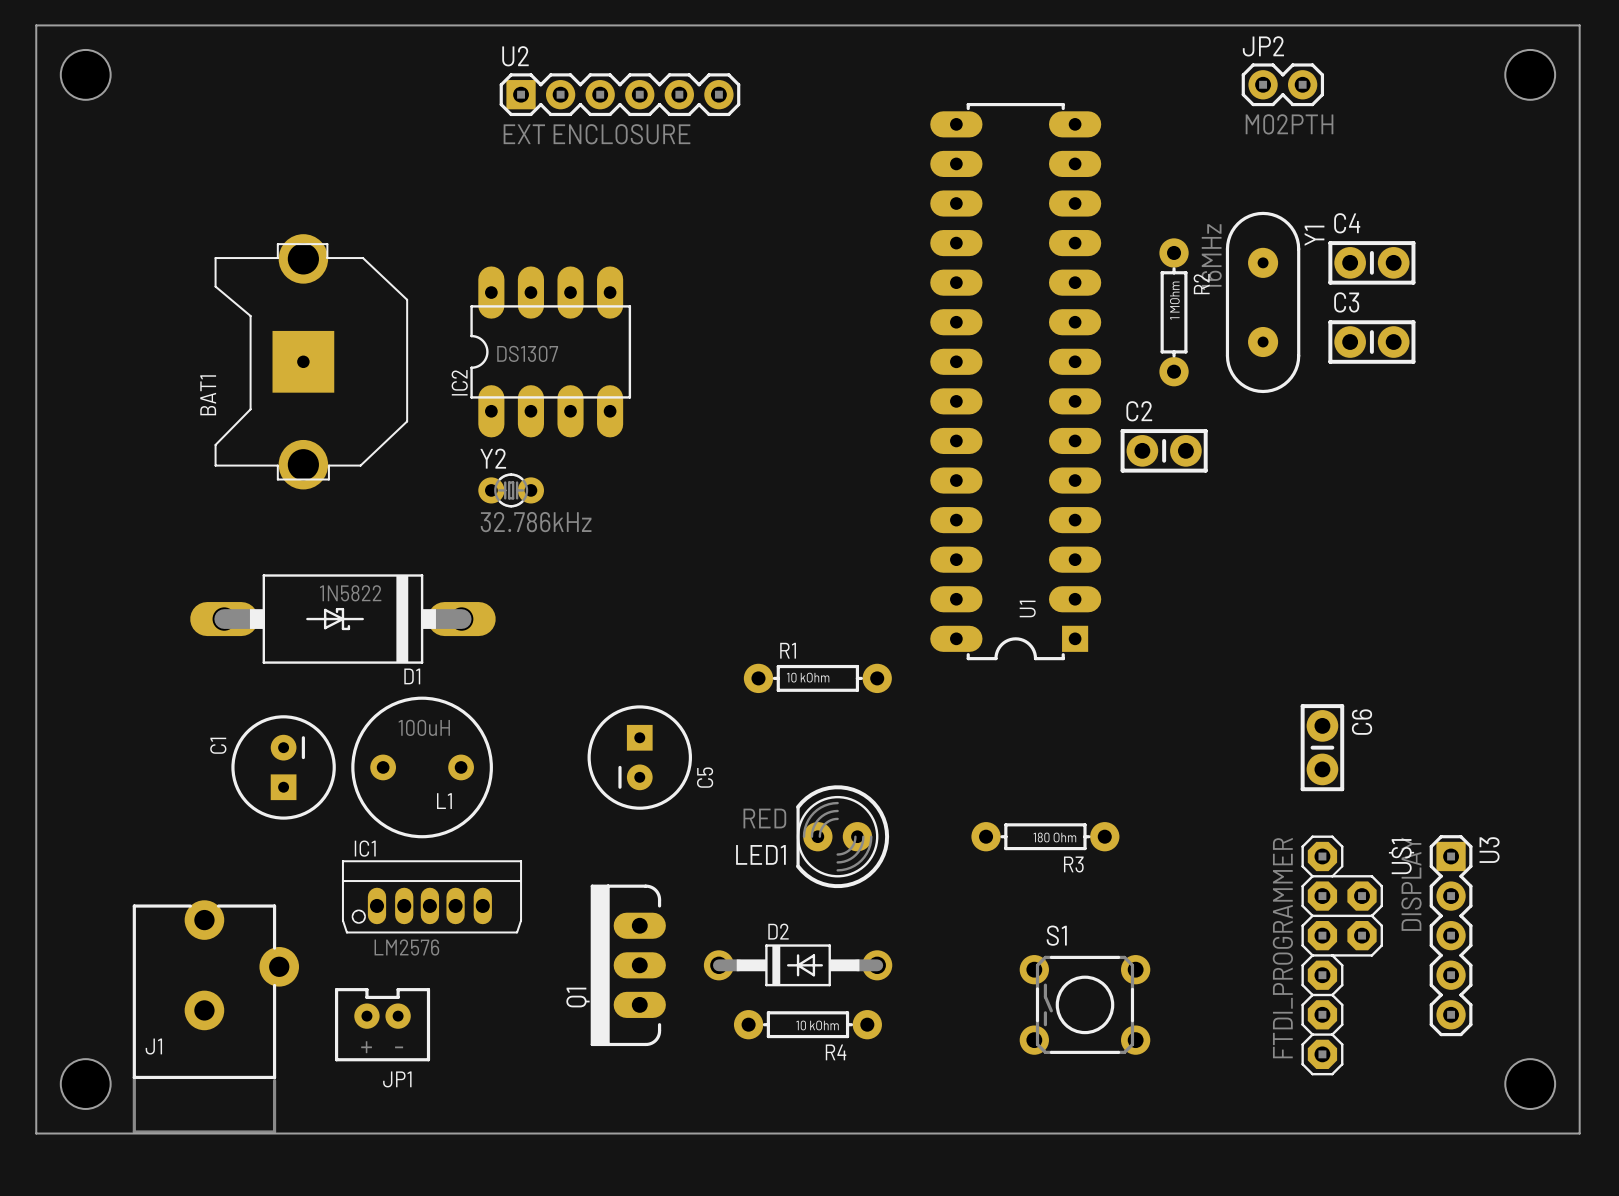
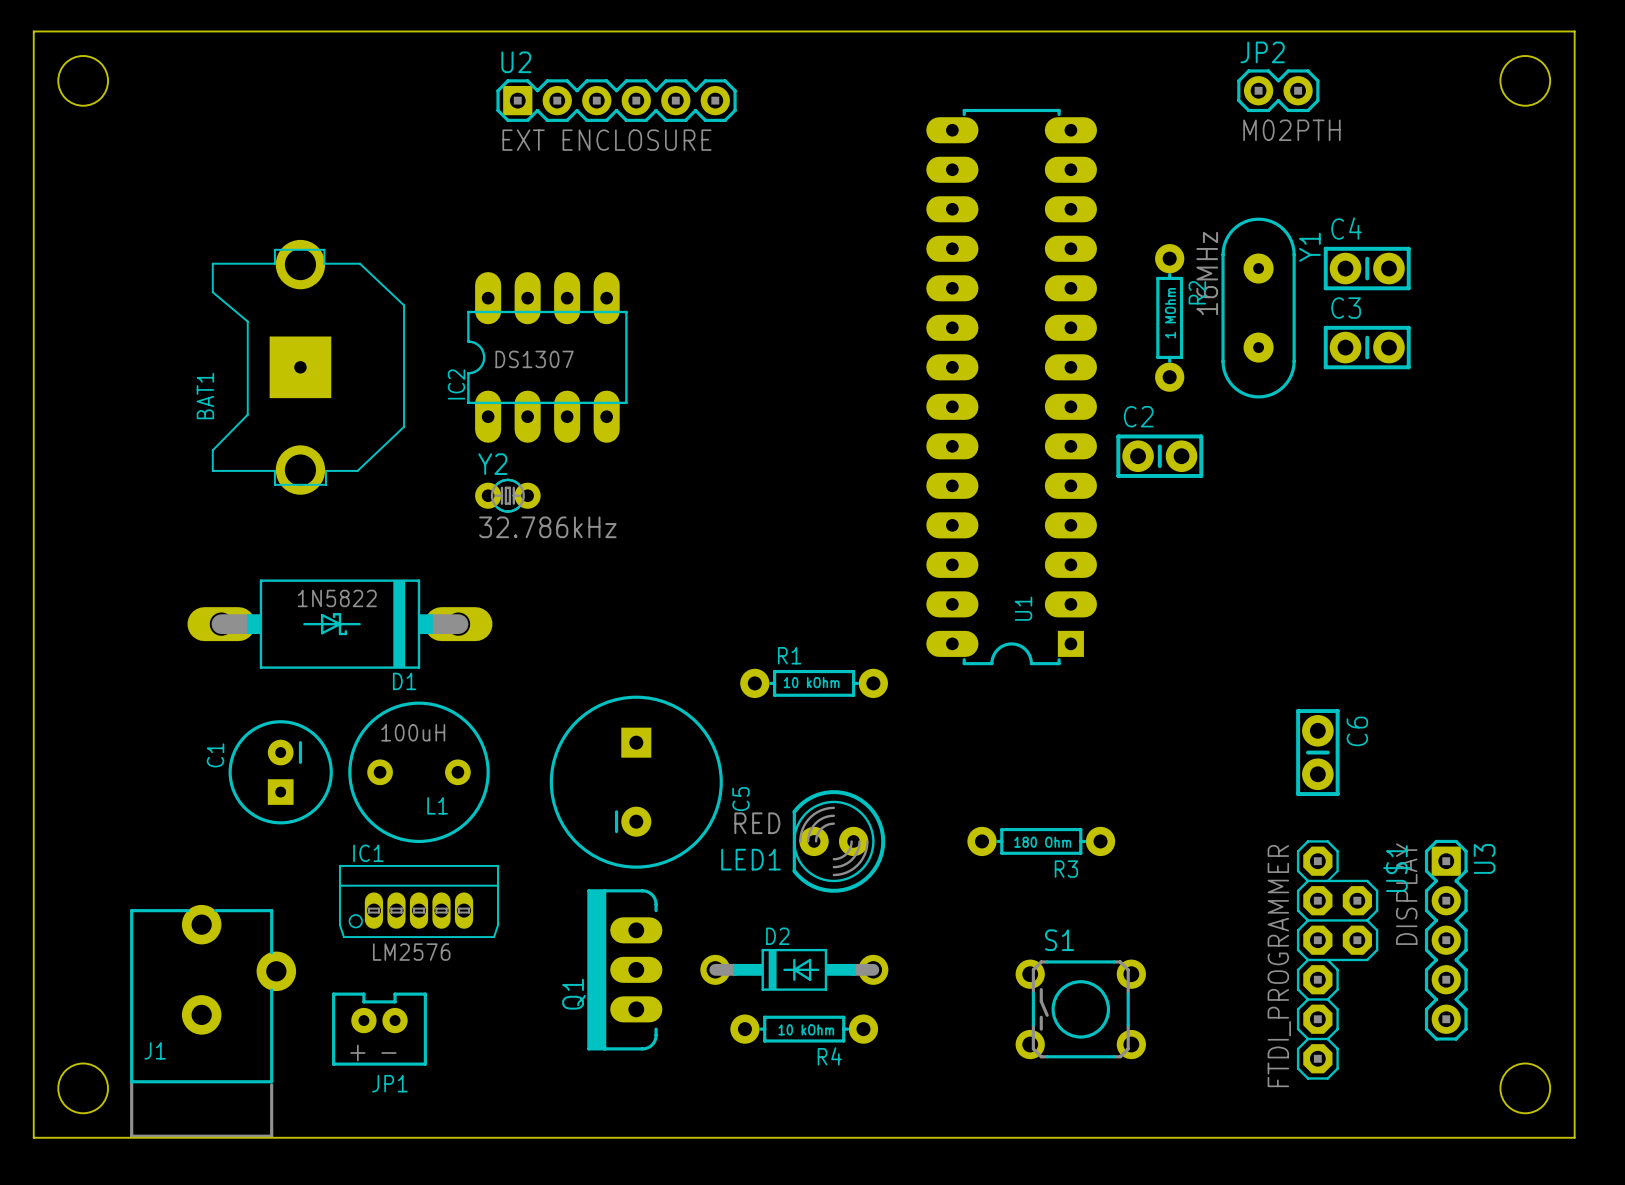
C5 footprint: [587, 705, 692, 810] -> [549, 695, 723, 869]
C5 name position: C5 (705, 777) -> C5 (740, 799)
IC1 footprint: [341, 860, 523, 934] -> [338, 864, 499, 939]

